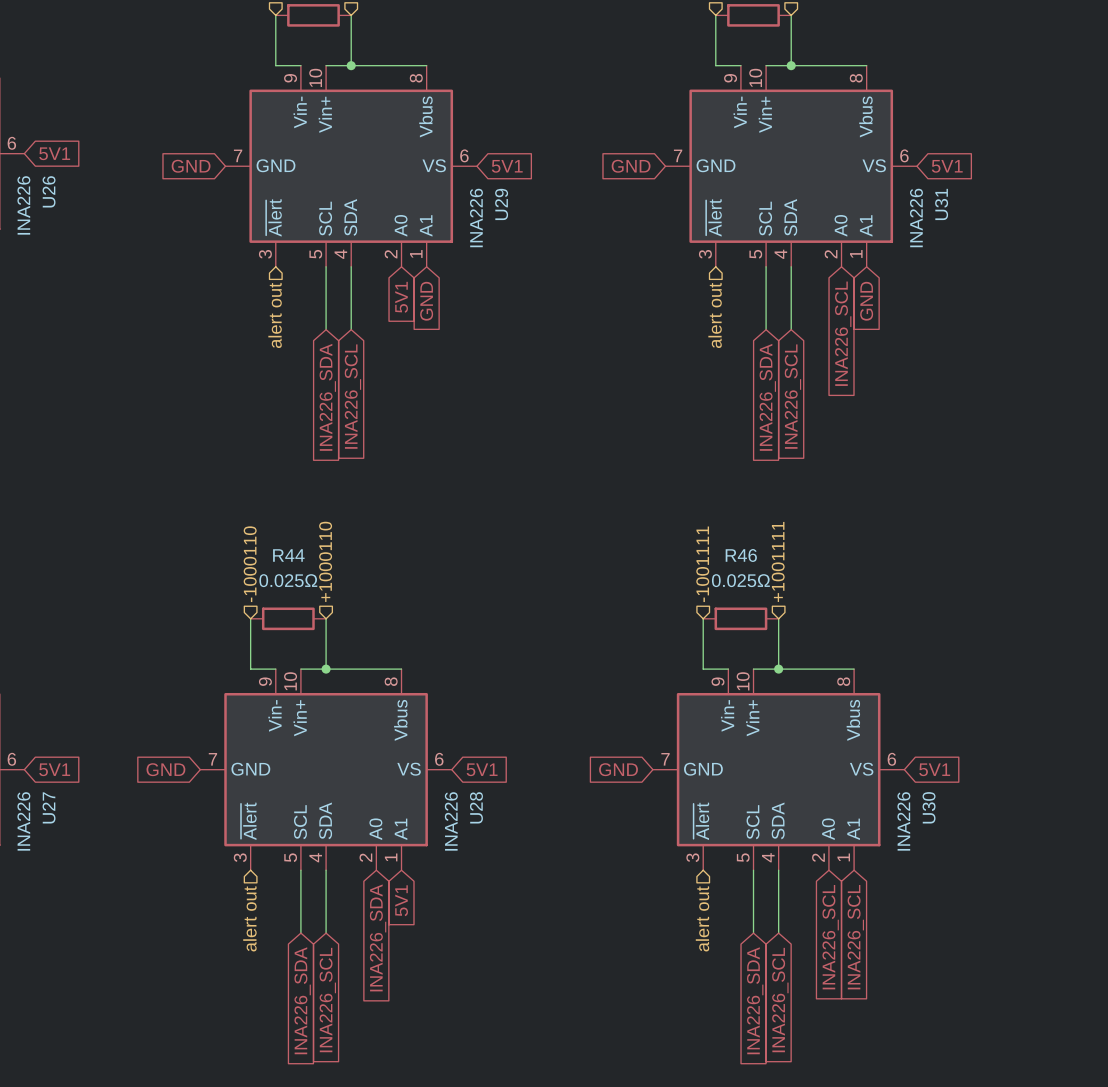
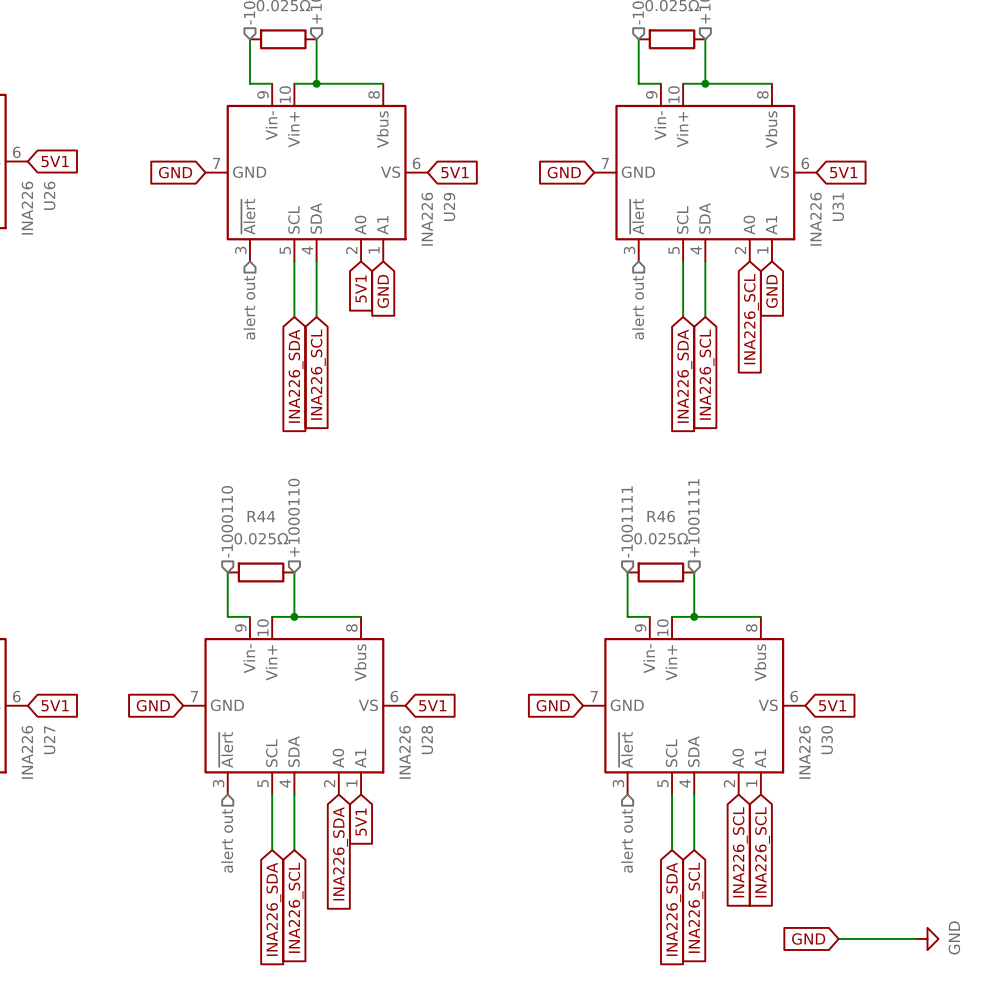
global label: none -> GND (808, 938)
wire: none -> (838, 938) (916, 938)
power symbol: none -> GND (927, 938)

